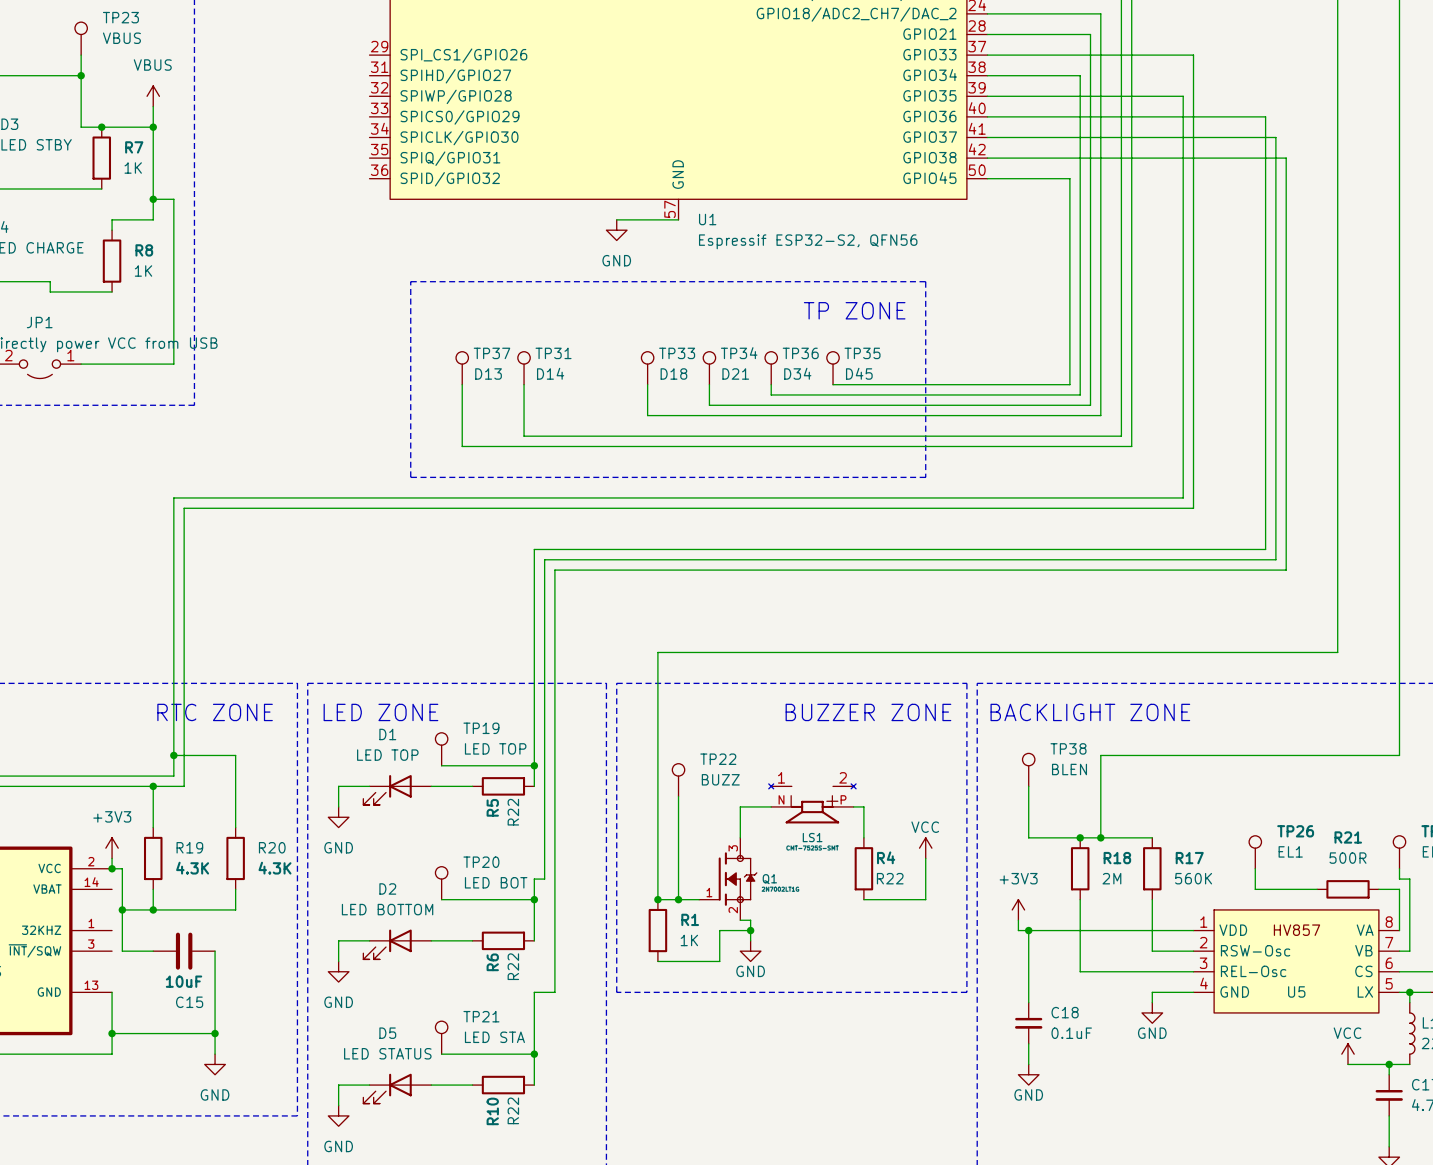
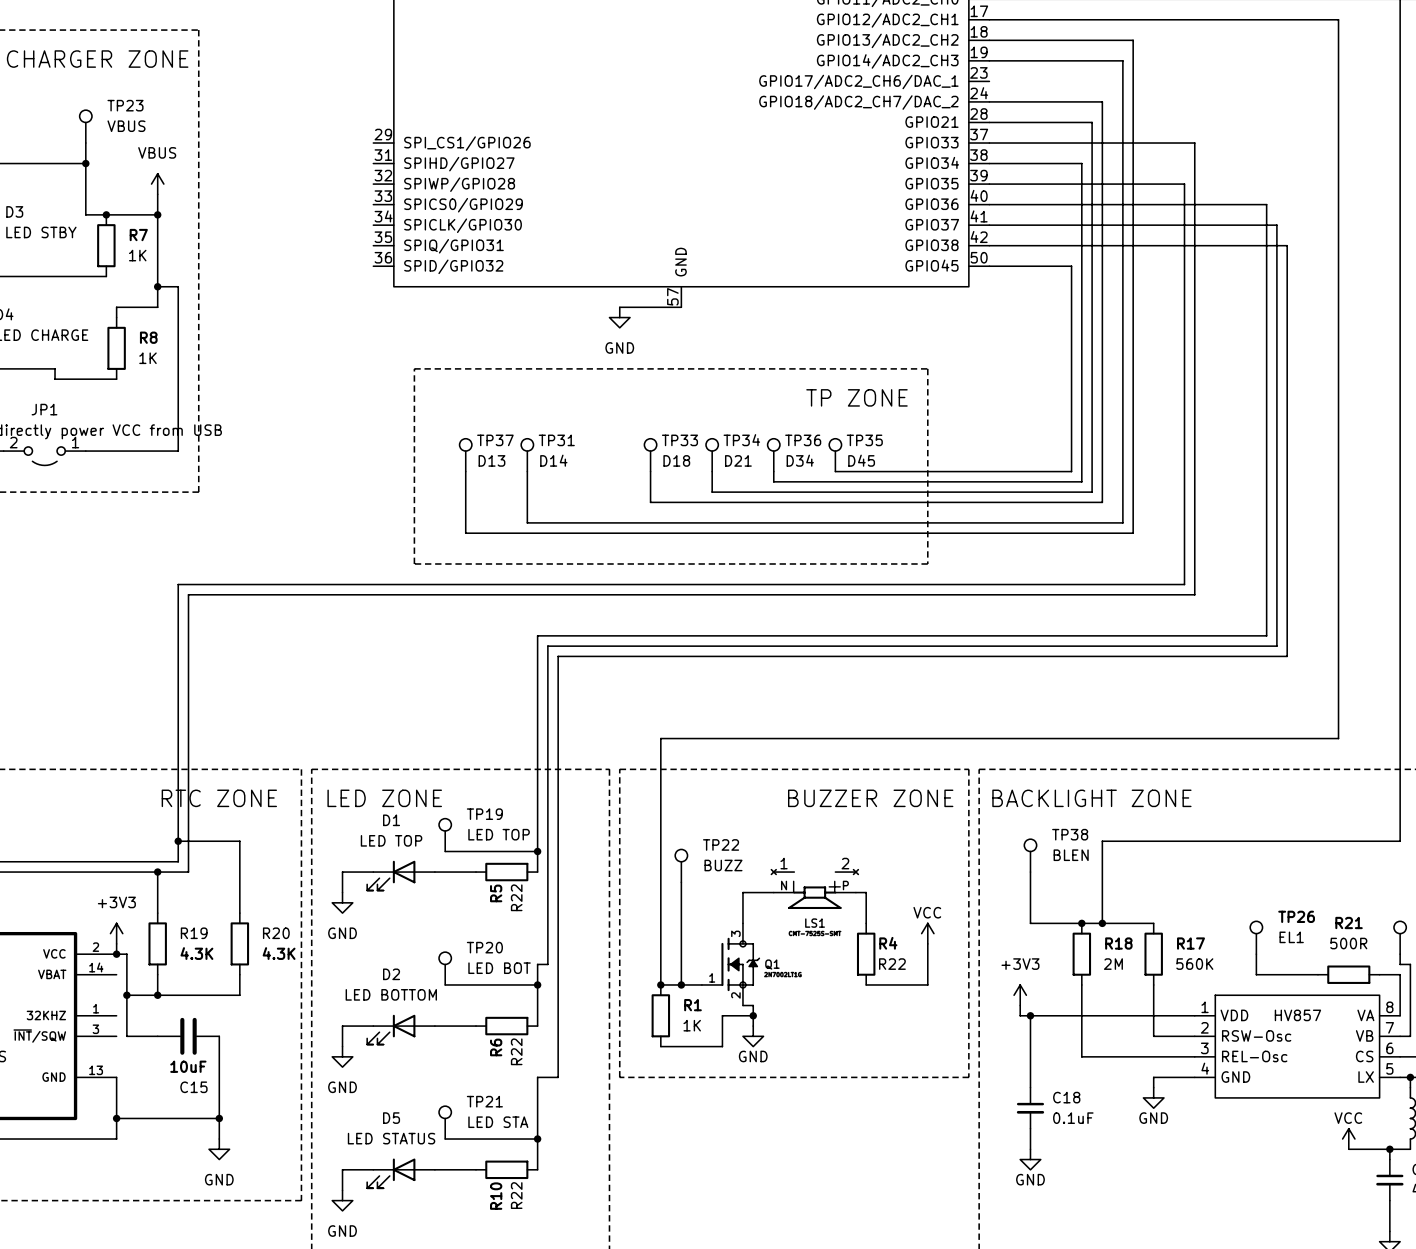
U1 name: U1 (707, 219) -> none
U1 value: Espressif ESP32-S2, QFN56 (808, 241) -> none
U5 name: U5 (1296, 991) -> none

